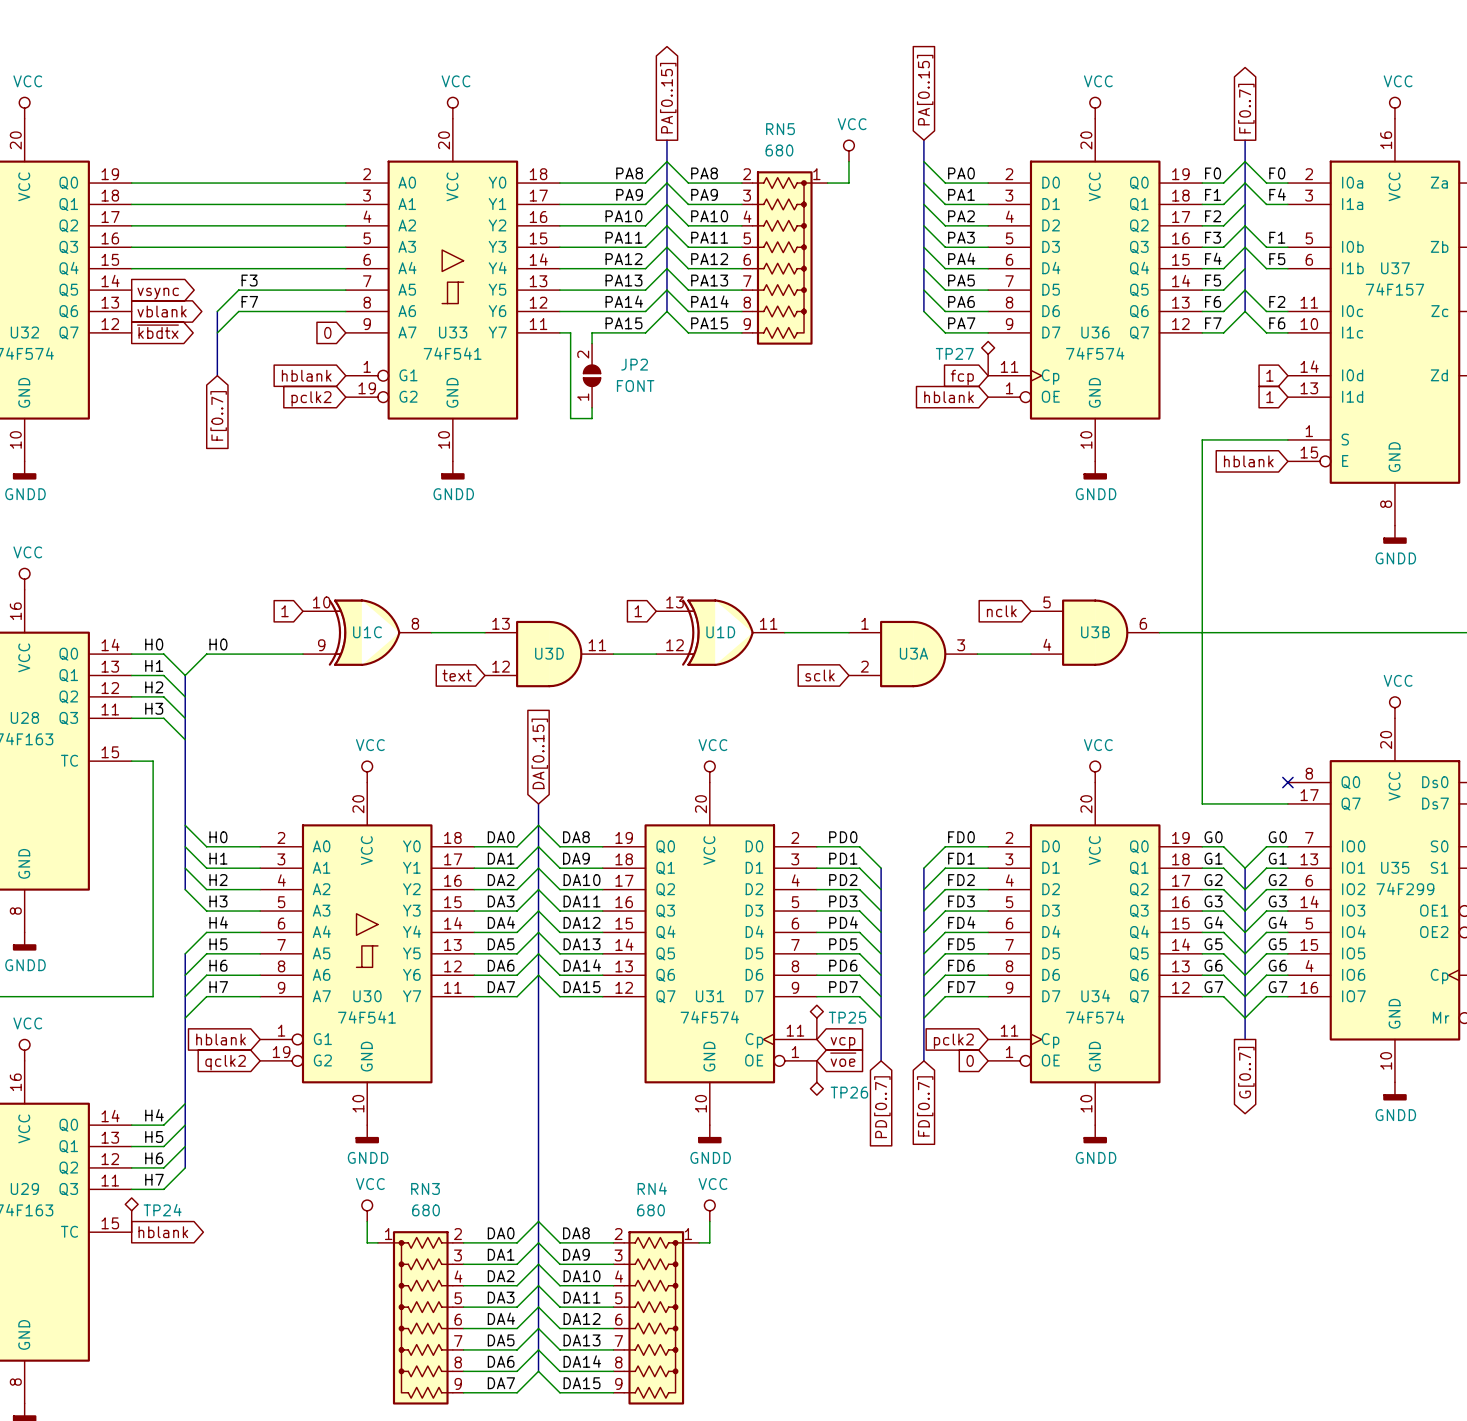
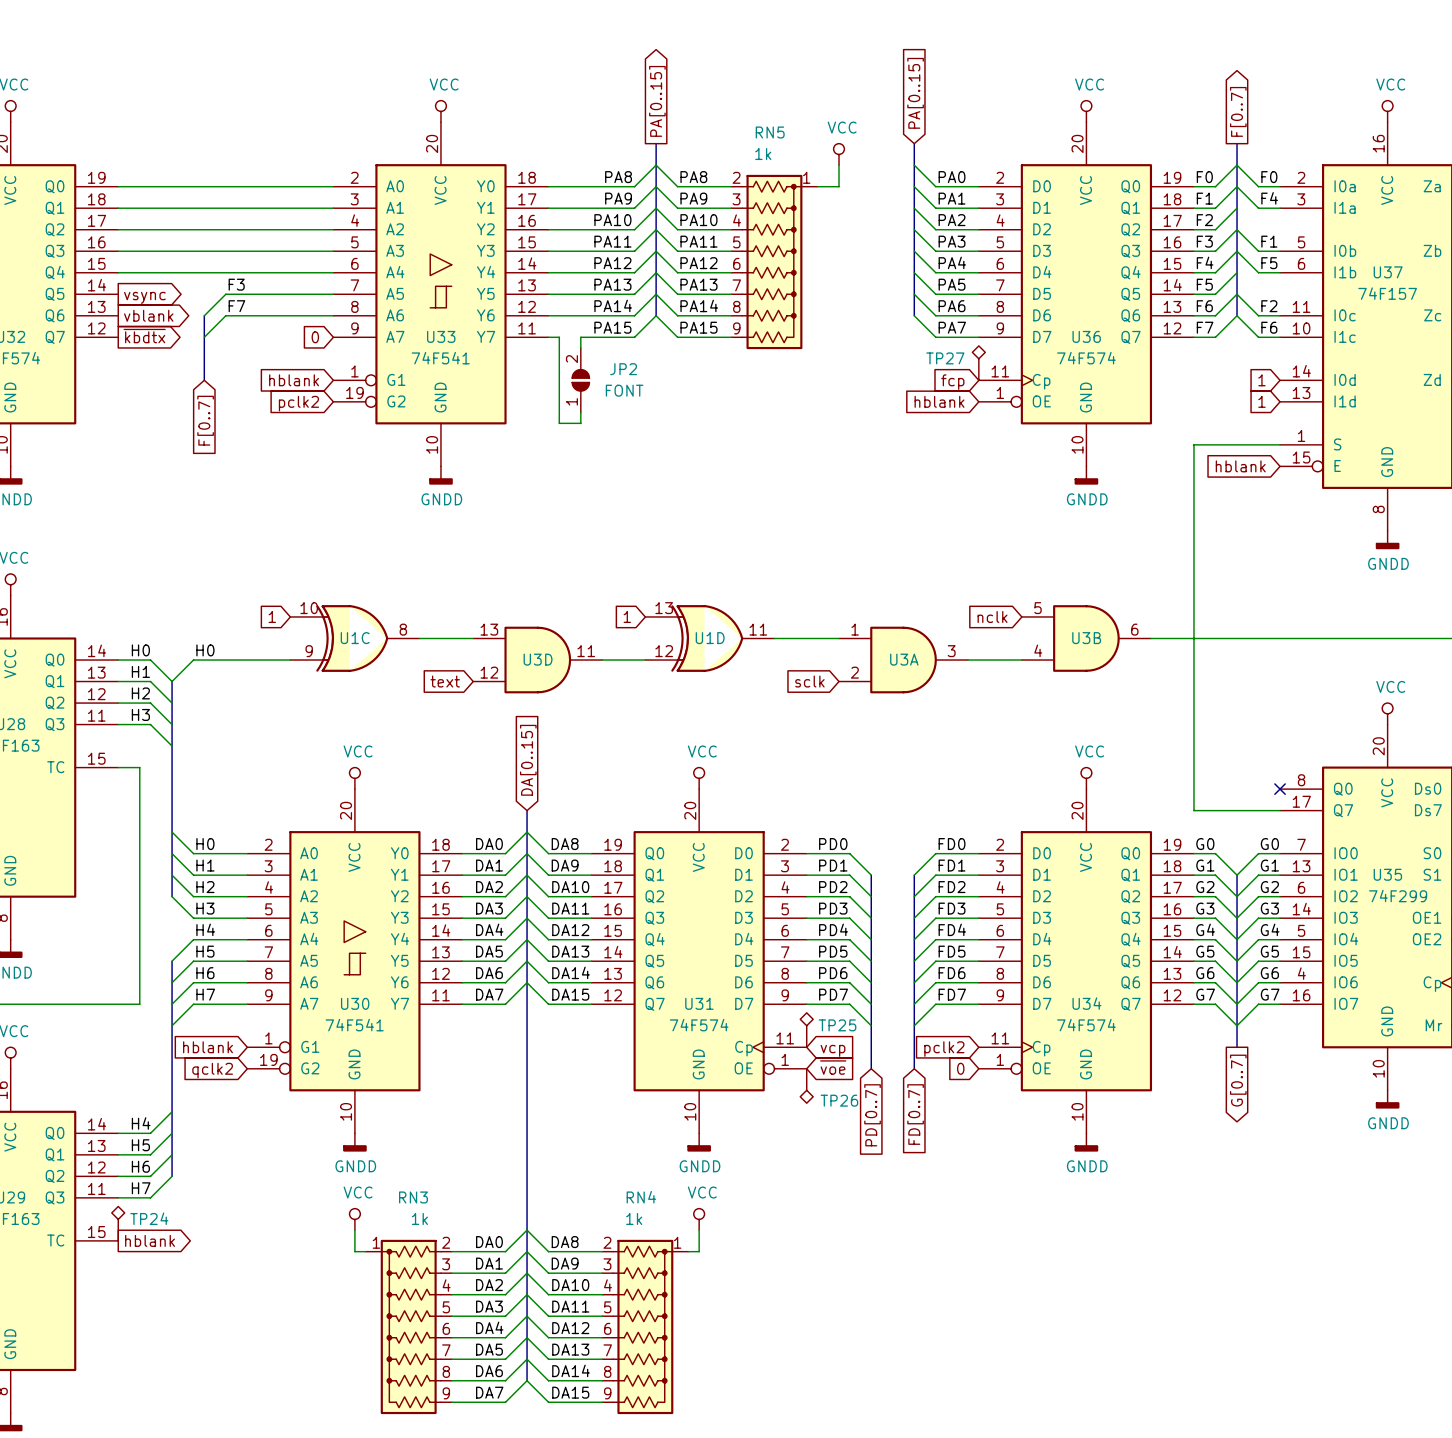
RN5 value: 680 (779, 150) -> 1k (763, 154)
RN3 value: 680 (426, 1210) -> 1k (419, 1218)
RN4 value: 680 (651, 1210) -> 1k (634, 1218)

